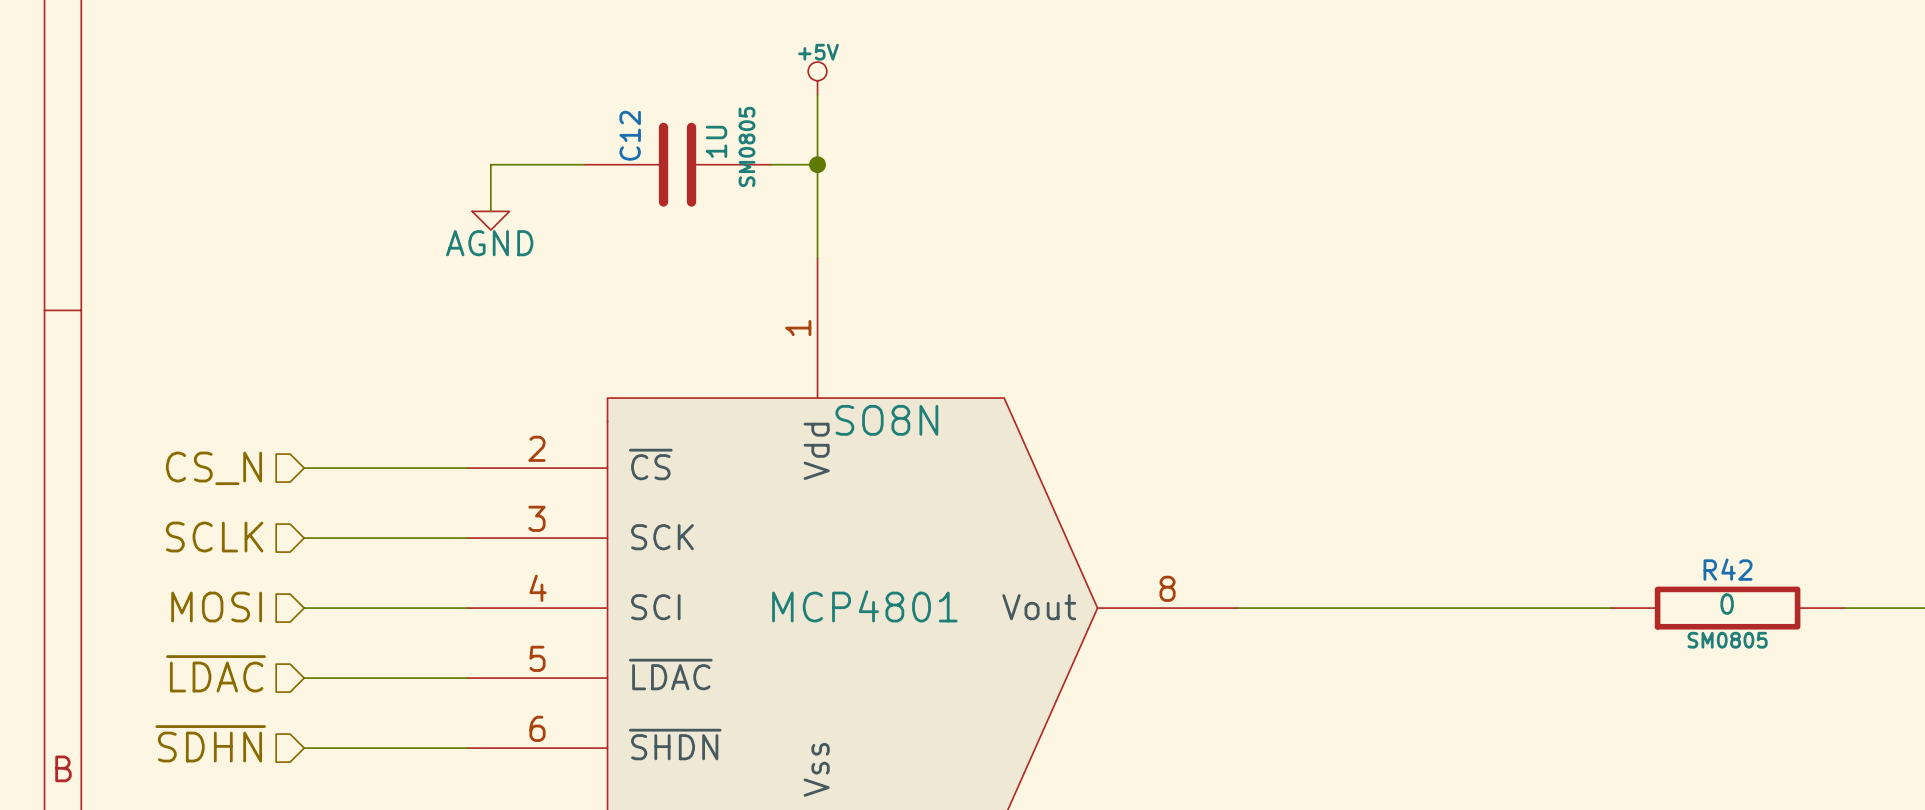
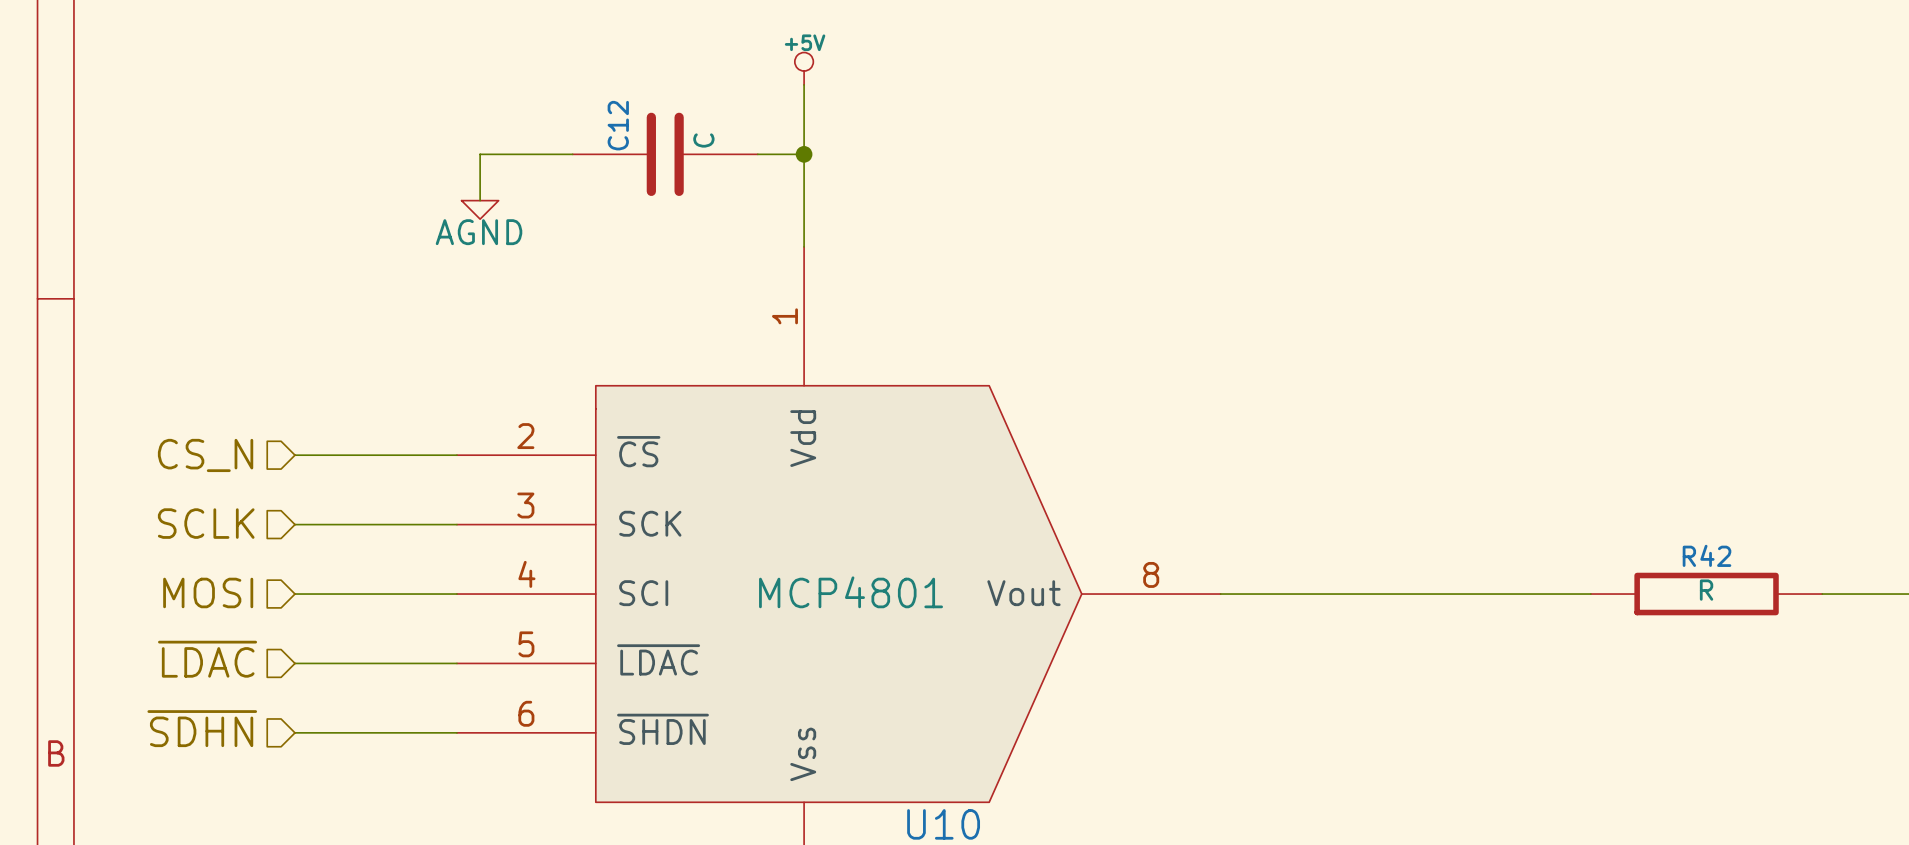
C12 value: 1U (716, 141) -> C (703, 140)
C12 text: SM0805 (747, 146) -> none
U10 text: SO8N (886, 420) -> none
R42 value: 0 (1727, 604) -> R (1706, 590)
R42 text: SM0805 (1727, 640) -> none

